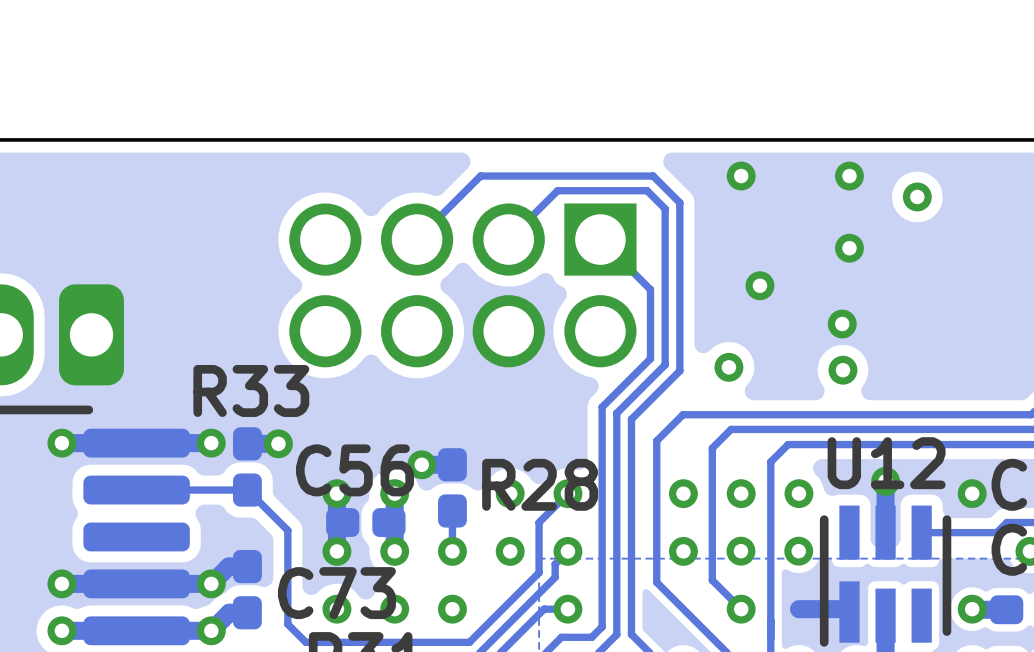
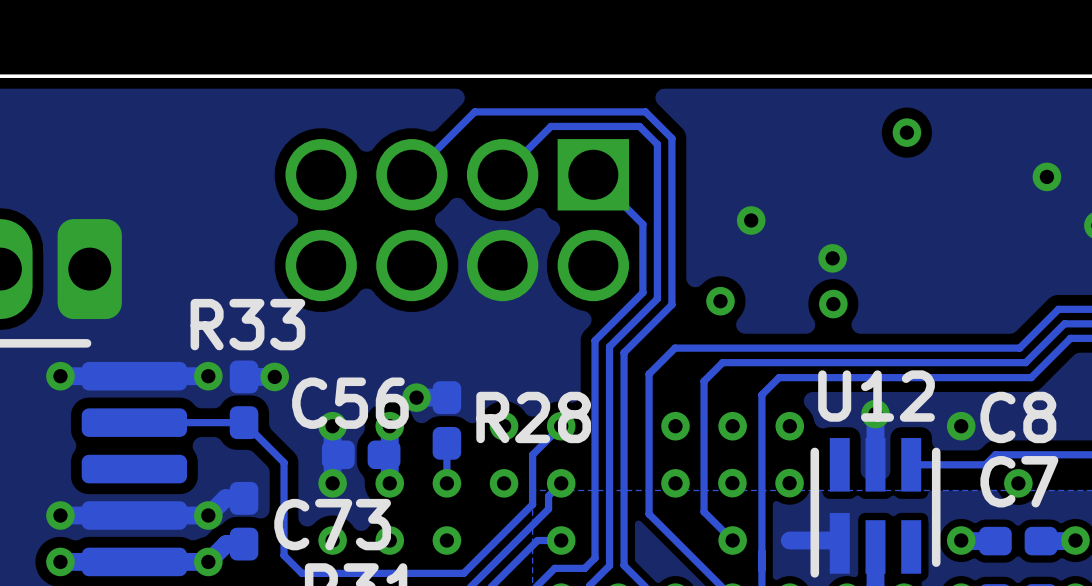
via: (741, 176) -> none
via: (849, 176) -> none
via: (849, 248) -> none

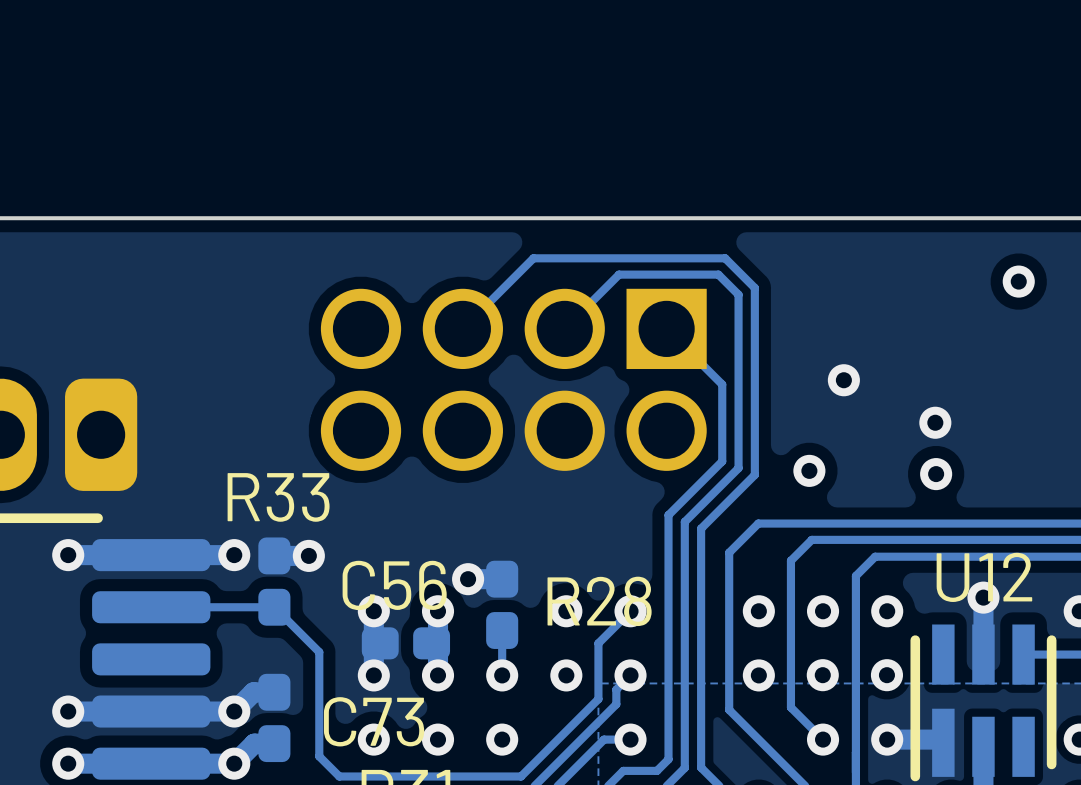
via: none -> (887, 739)

